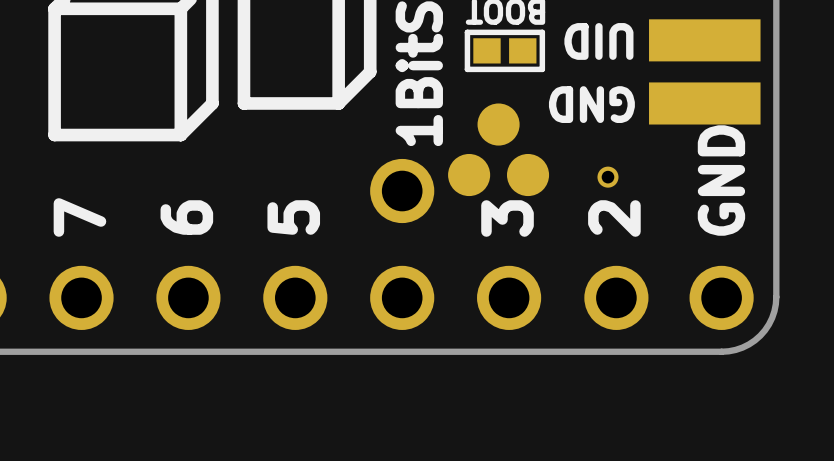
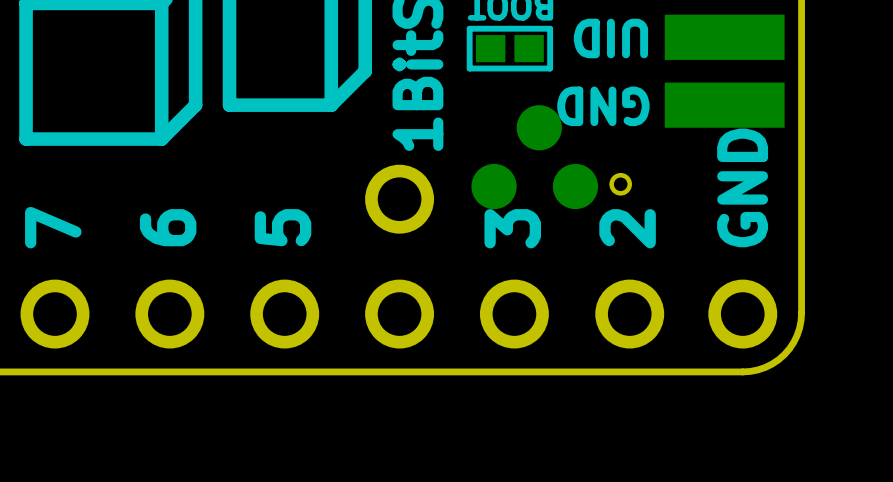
part: (498, 124) -> none
part: none -> (539, 127)
part: (469, 175) -> none
part: (528, 175) -> none
part: none -> (494, 186)
part: none -> (575, 186)

